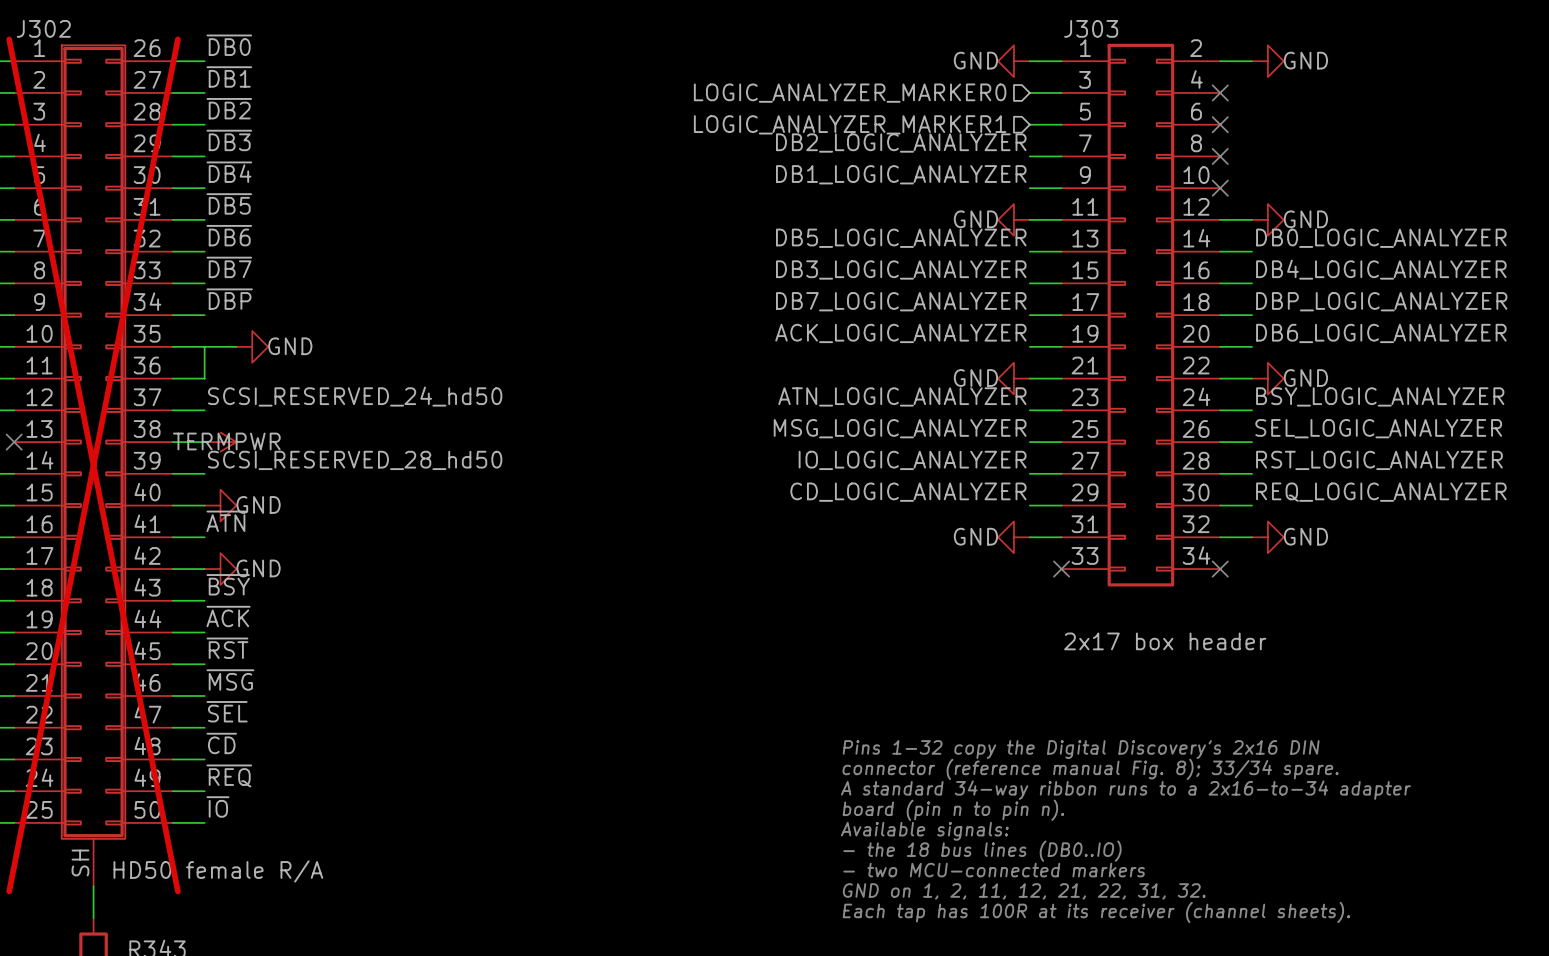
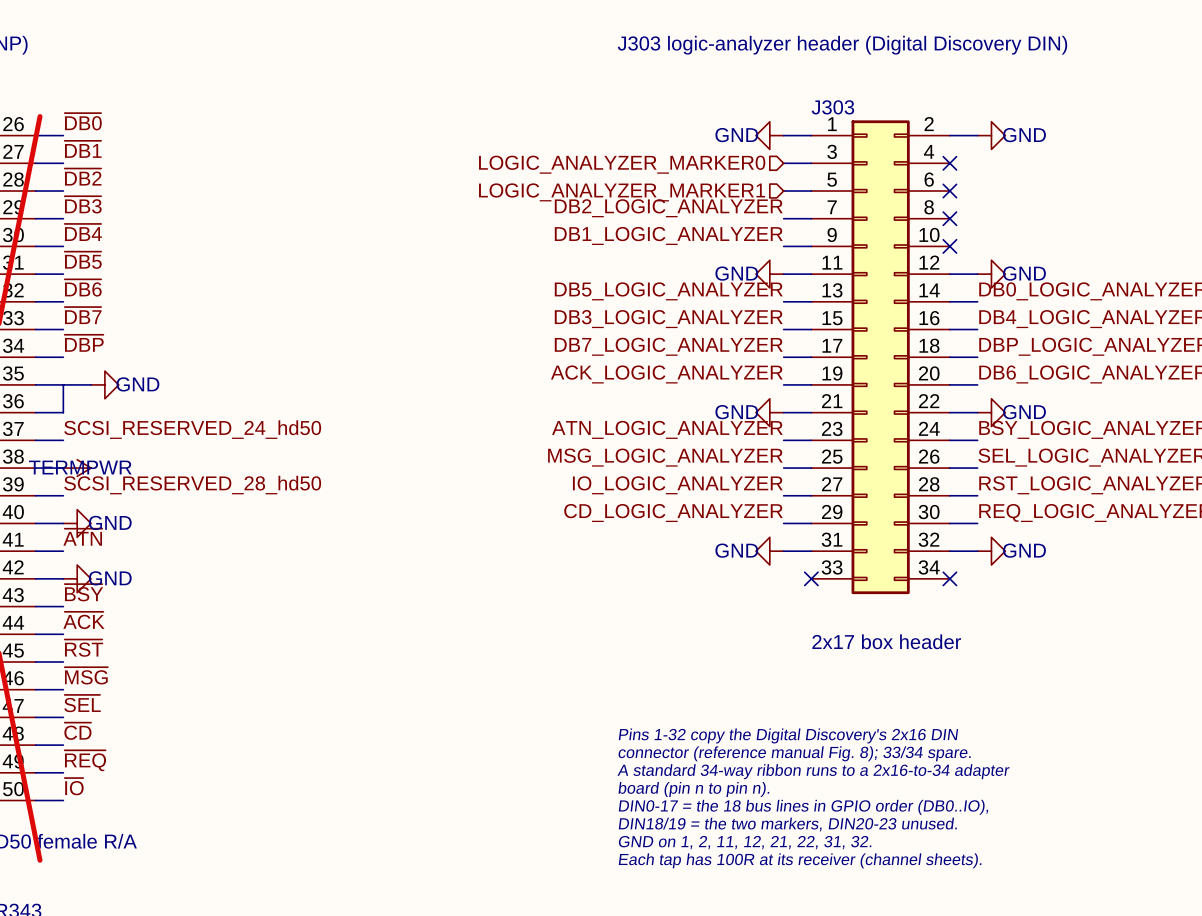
text: Available signals: (924, 831) -> DIN0-17 = the 18 bus lines in GPIO order (DB0..IO), (803, 807)
text: - the 18 bus lines (DB0..IO) (982, 851) -> DIN18/19 = the two markers, DIN20-23 unused. (787, 824)
text: - two MCU-connected markers (994, 870) -> GND on 1, 2, 11, 12, 21, 22, 31, 32. (745, 842)
text: GND on 1, 2, 11, 12, 21, 22, 31, 32. (1024, 891) -> Each tap has 100R at its receiver (channel sheets). (800, 860)
text: Each tap has 100R at its receiver (channel sheets). (1096, 912) -> none

